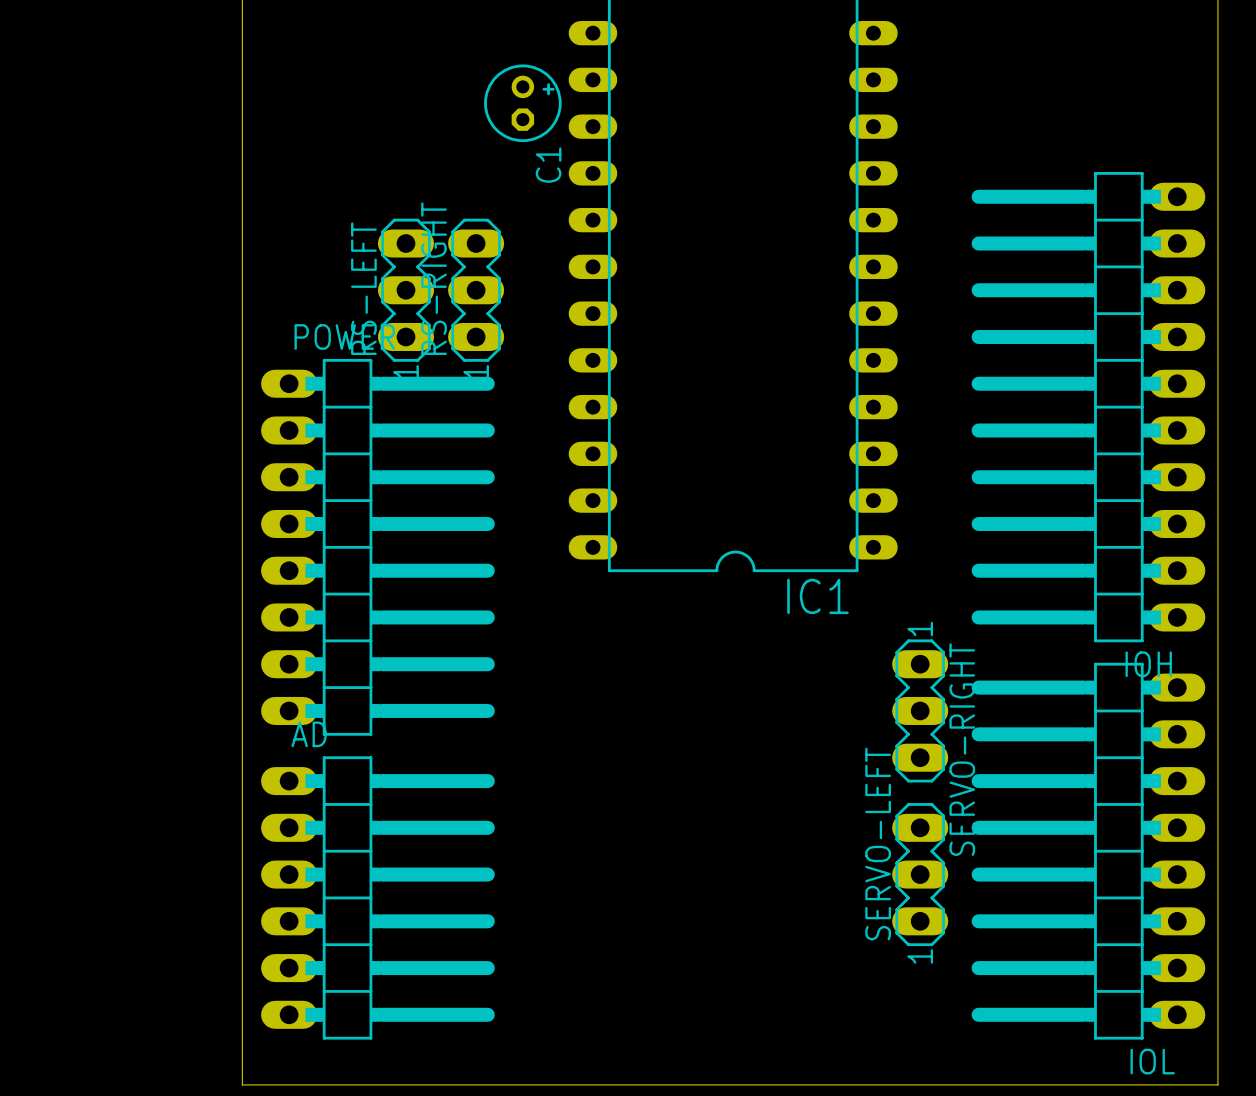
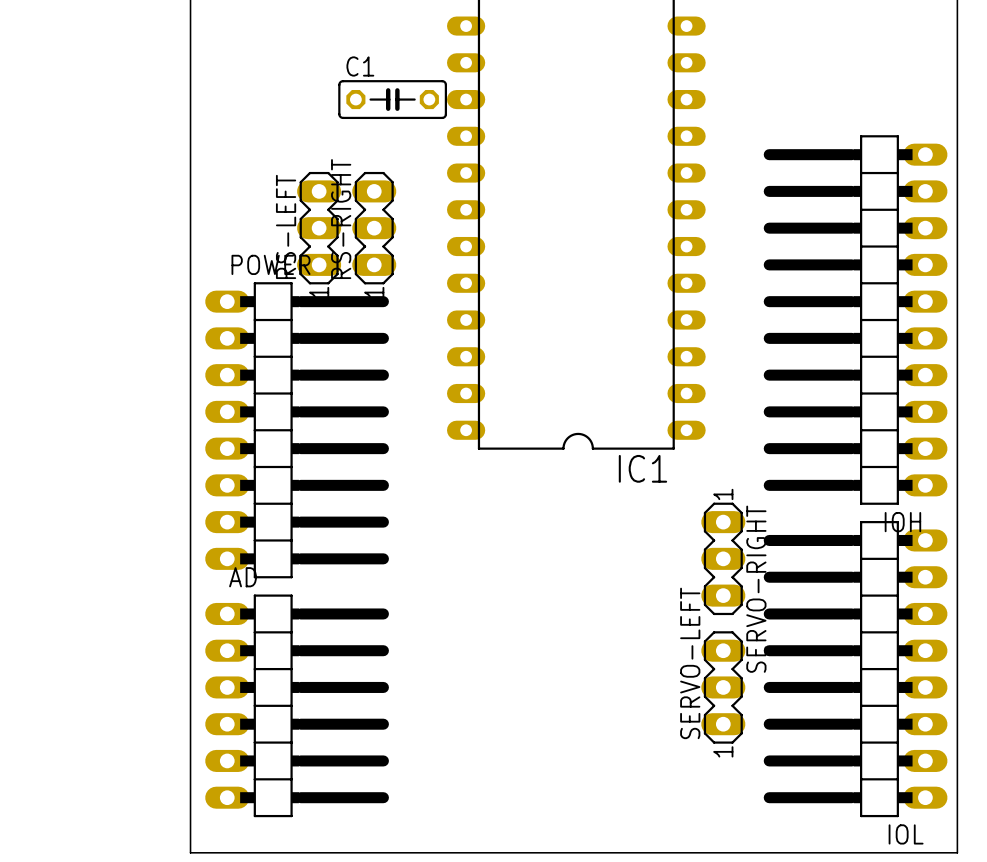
C1 footprint: [484, 64, 562, 143] -> [338, 80, 448, 120]
C1 name position: C1 (548, 165) -> C1 (360, 66)

